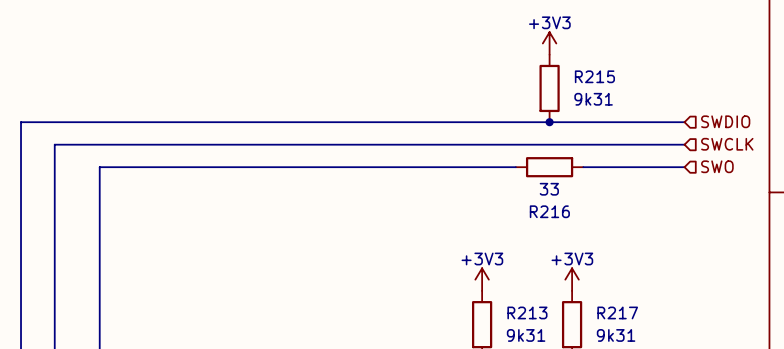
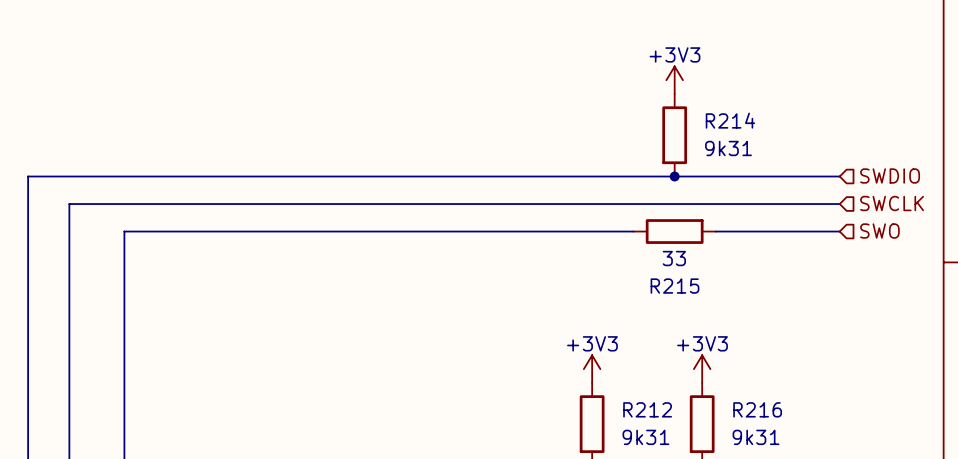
R215 name: R215 (594, 76) -> R214 (730, 120)
R216 name: R216 (549, 211) -> R215 (675, 286)
R213 name: R213 (527, 312) -> R212 (647, 409)
R217 name: R217 (617, 312) -> R216 (757, 409)

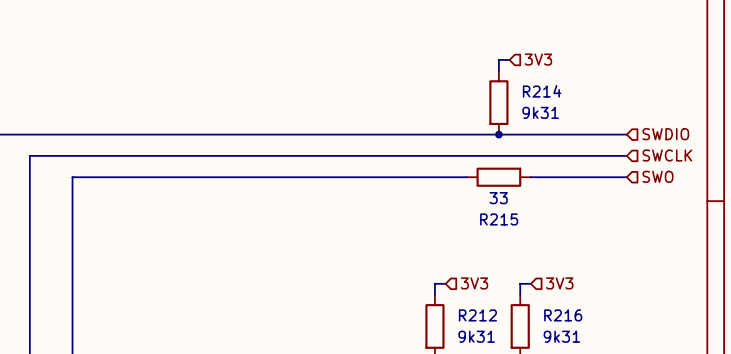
hierarchical label: none -> 3V3 (538, 59)
power symbol: +3V3 (674, 80) -> none
hierarchical label: none -> 3V3 (474, 283)
hierarchical label: none -> 3V3 (559, 283)
power symbol: +3V3 (592, 369) -> none
power symbol: +3V3 (702, 369) -> none

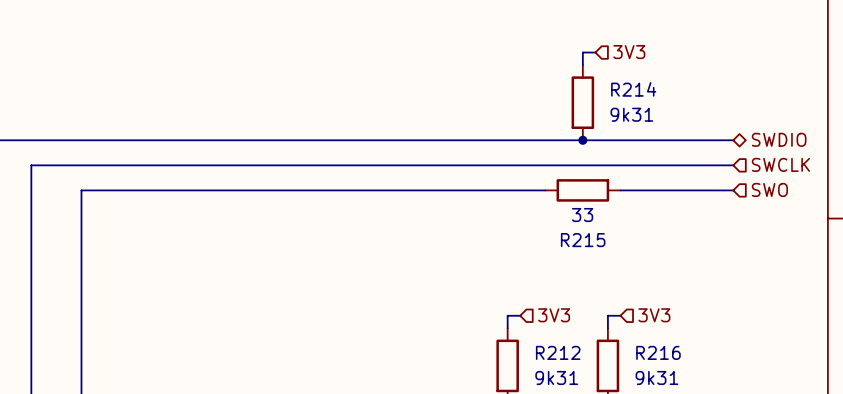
hierarchical label shape: input (665, 134) -> bidirectional (779, 139)

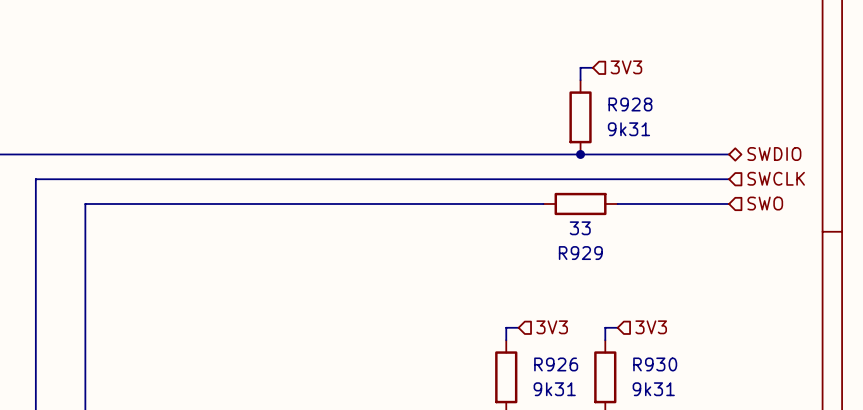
R214 name: R214 (633, 89) -> R928 (630, 104)
R215 name: R215 (583, 240) -> R929 (580, 253)
R212 name: R212 (558, 352) -> R926 (556, 364)
R216 name: R216 (658, 352) -> R930 (655, 364)

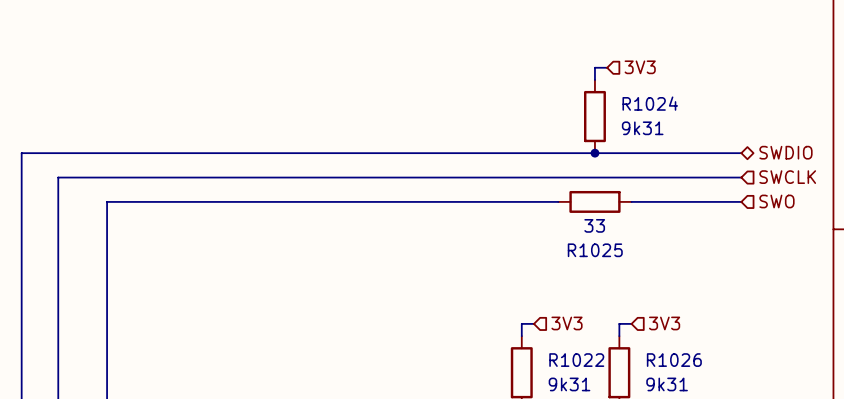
R928 name: R928 (630, 104) -> R1024 (650, 103)
R929 name: R929 (580, 253) -> R1025 (595, 250)
R926 name: R926 (556, 364) -> R1022 (576, 360)
R930 name: R930 (655, 364) -> R1026 (674, 360)

